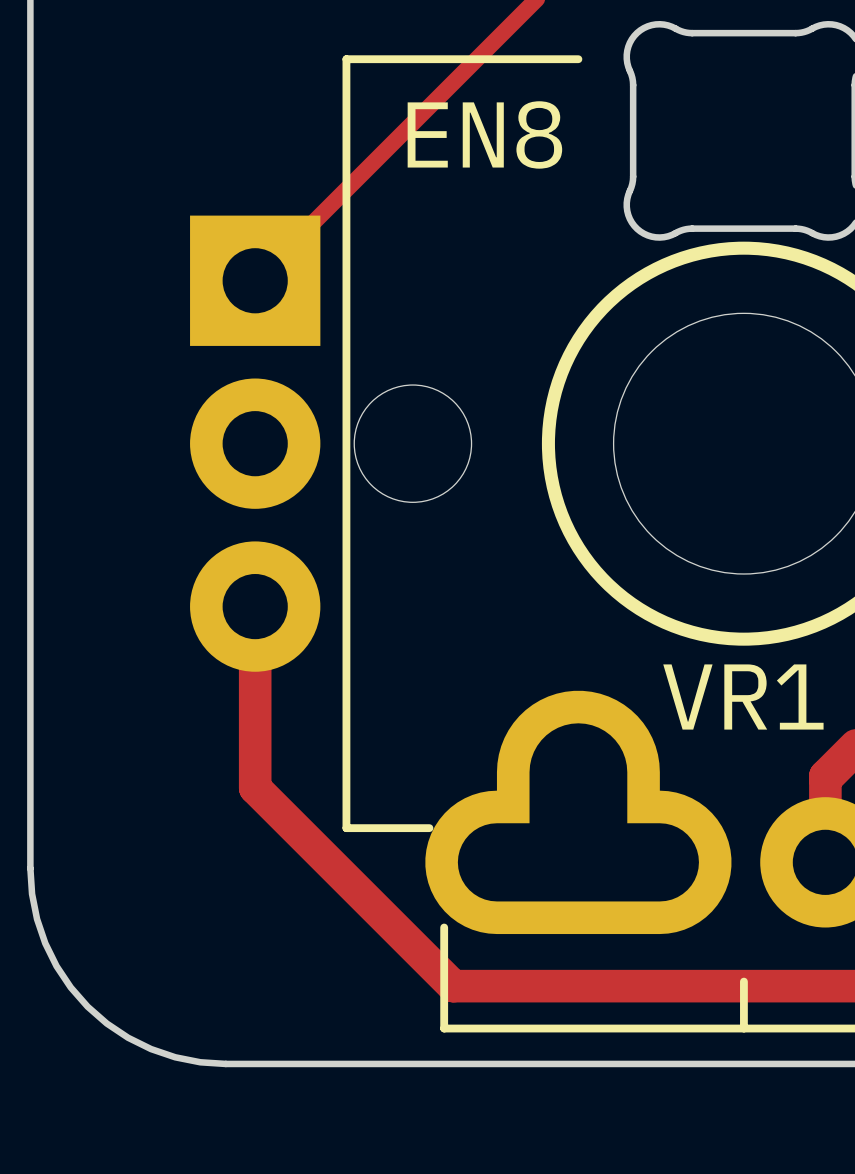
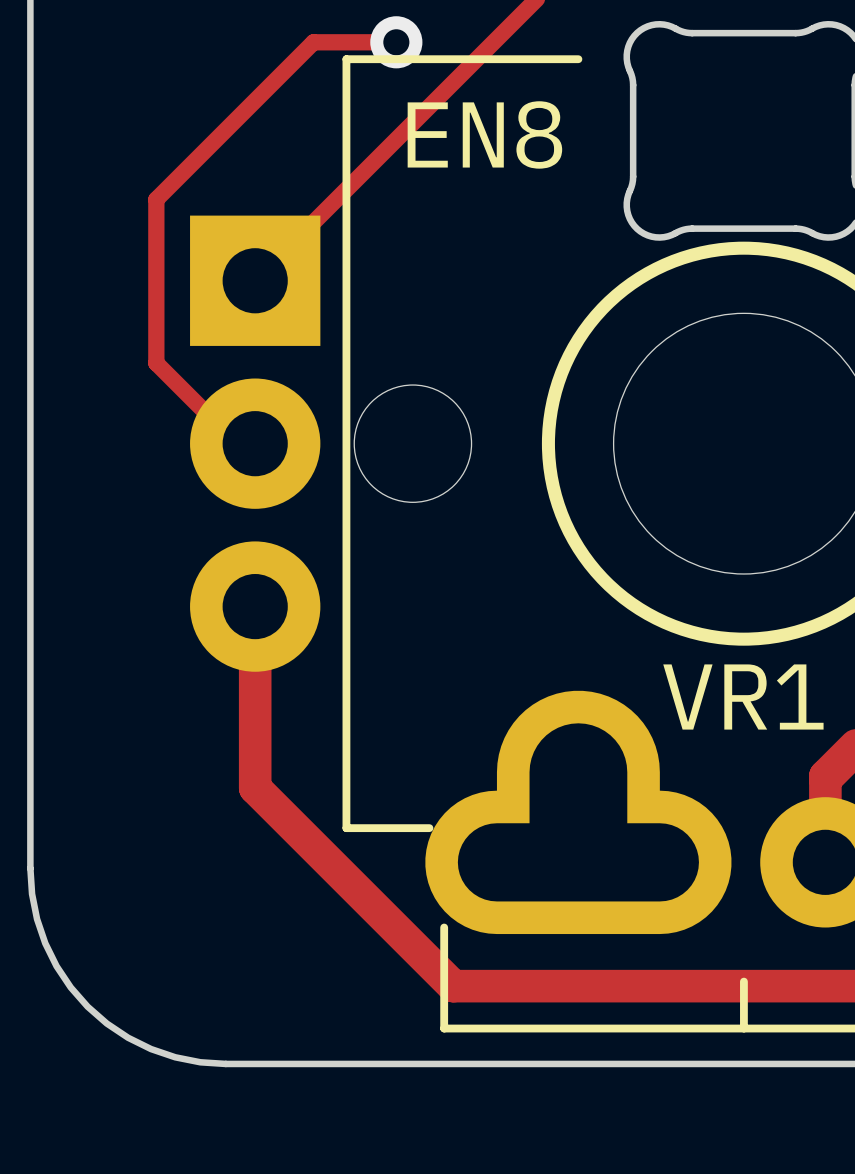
track: none -> (396, 42) (313, 42) (156, 199) (156, 363) (236, 443) (255, 443)
via: none -> (396, 42)

